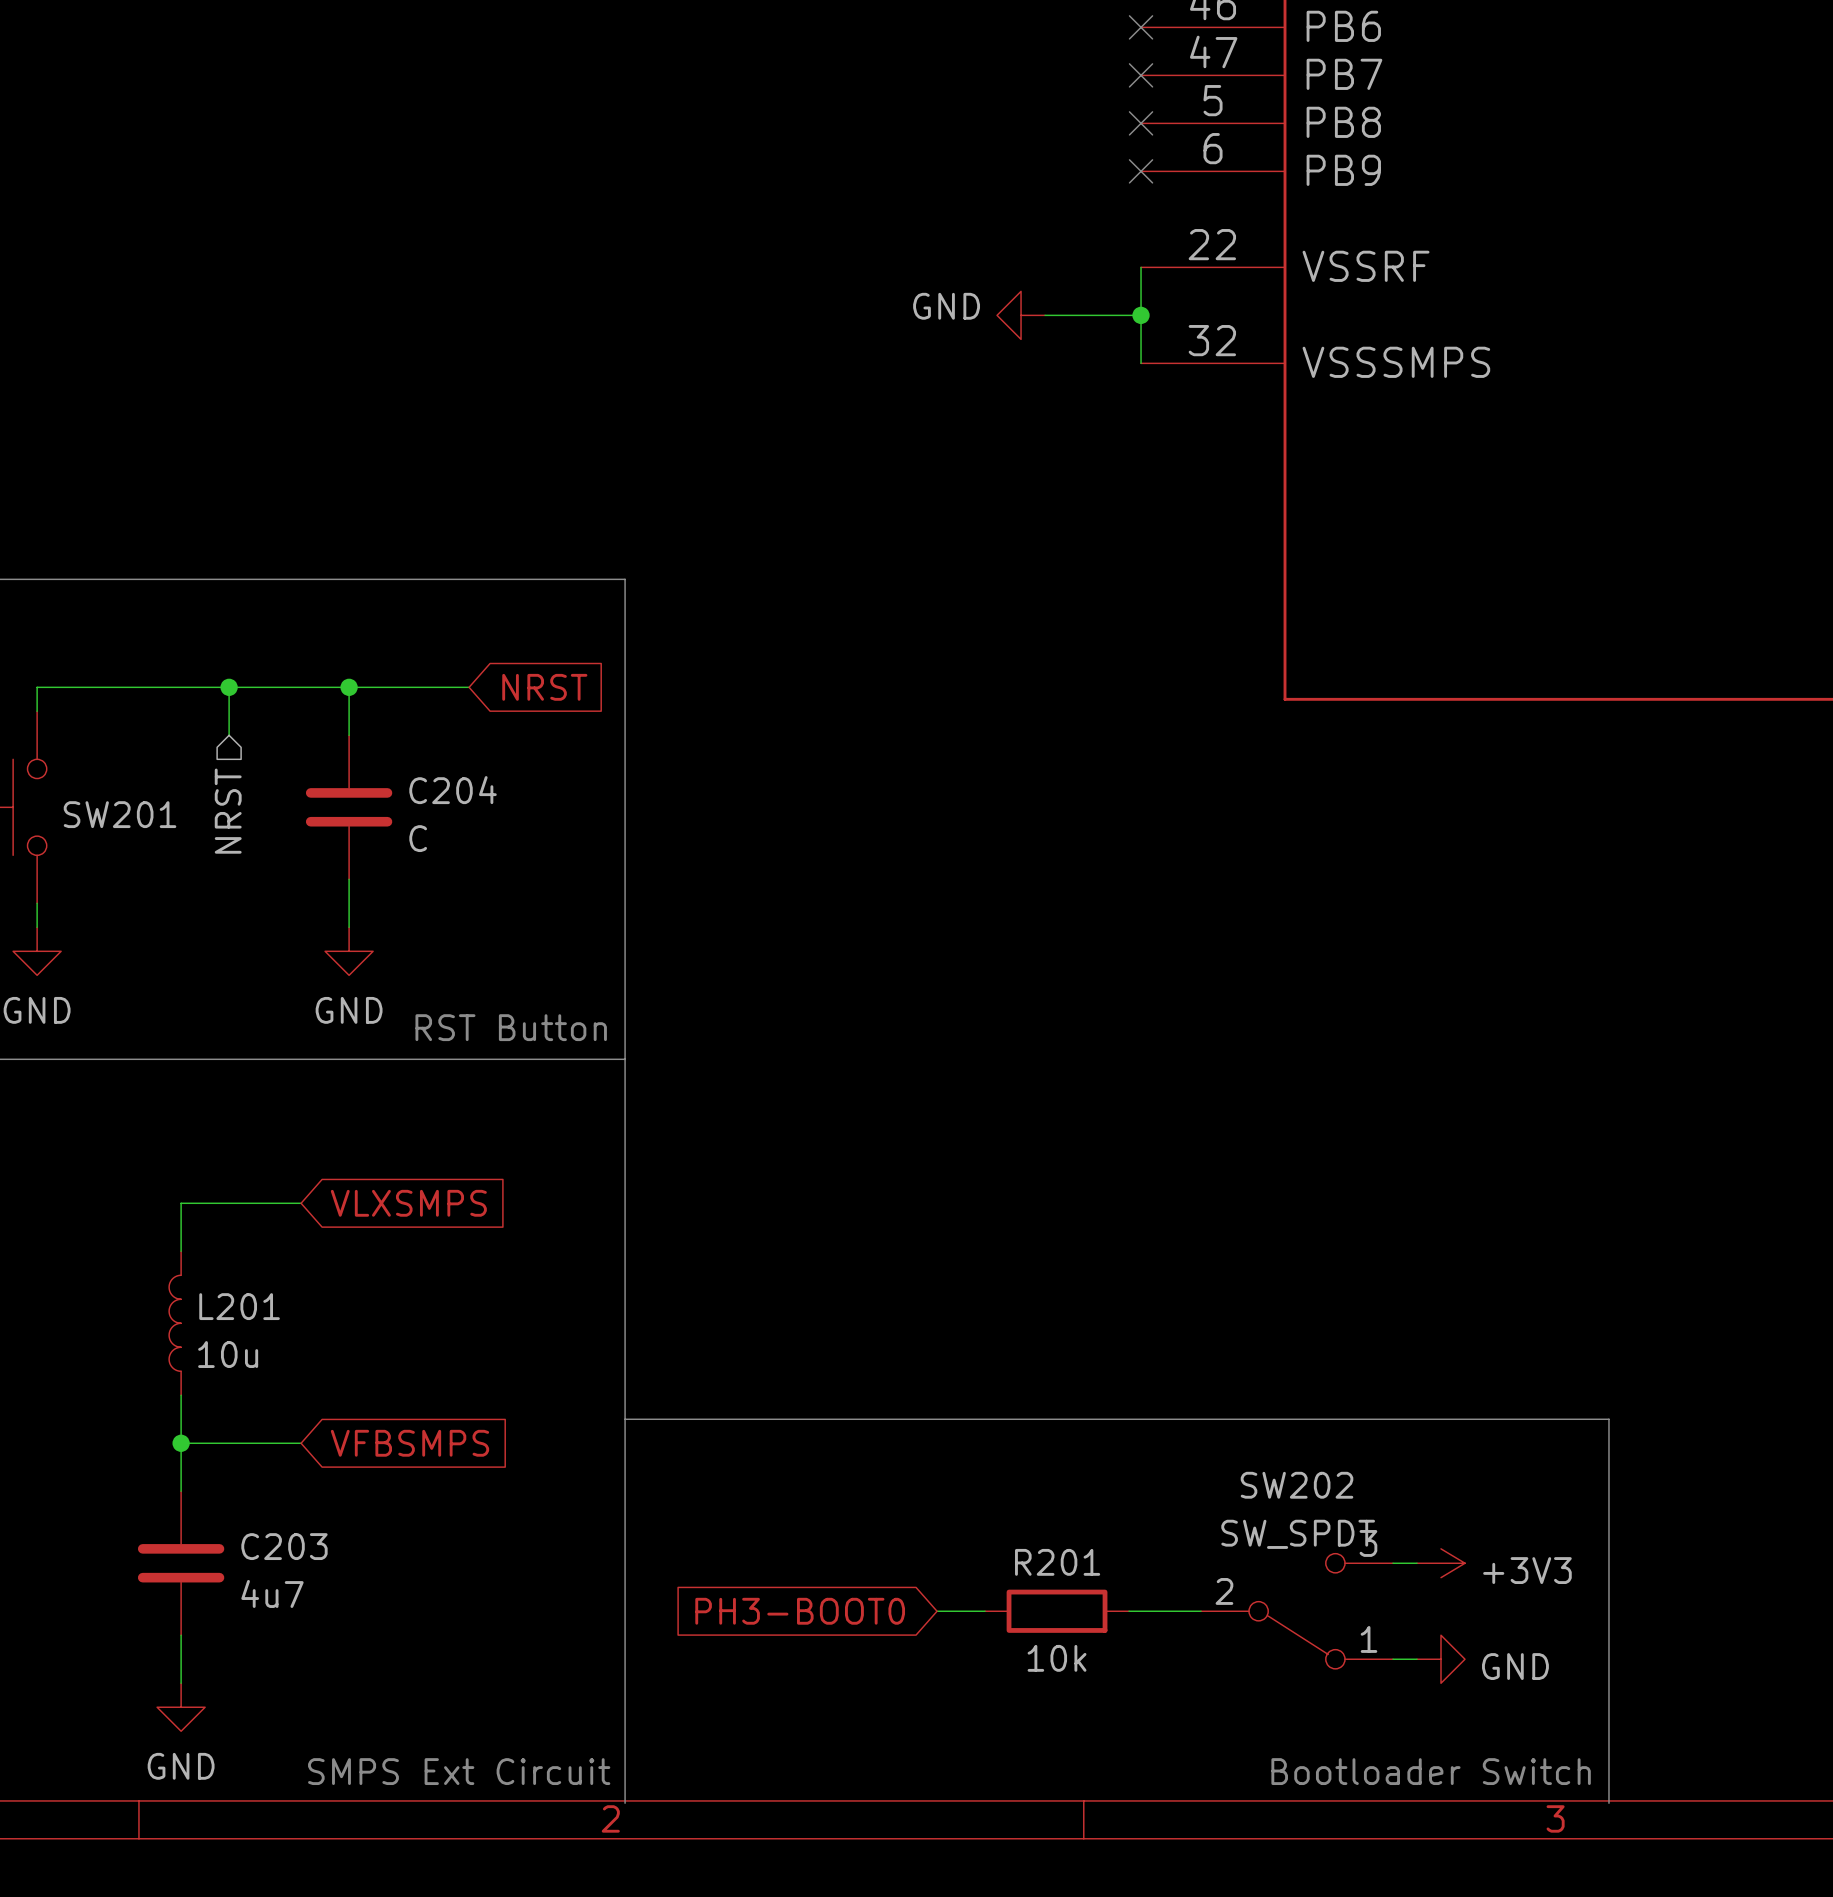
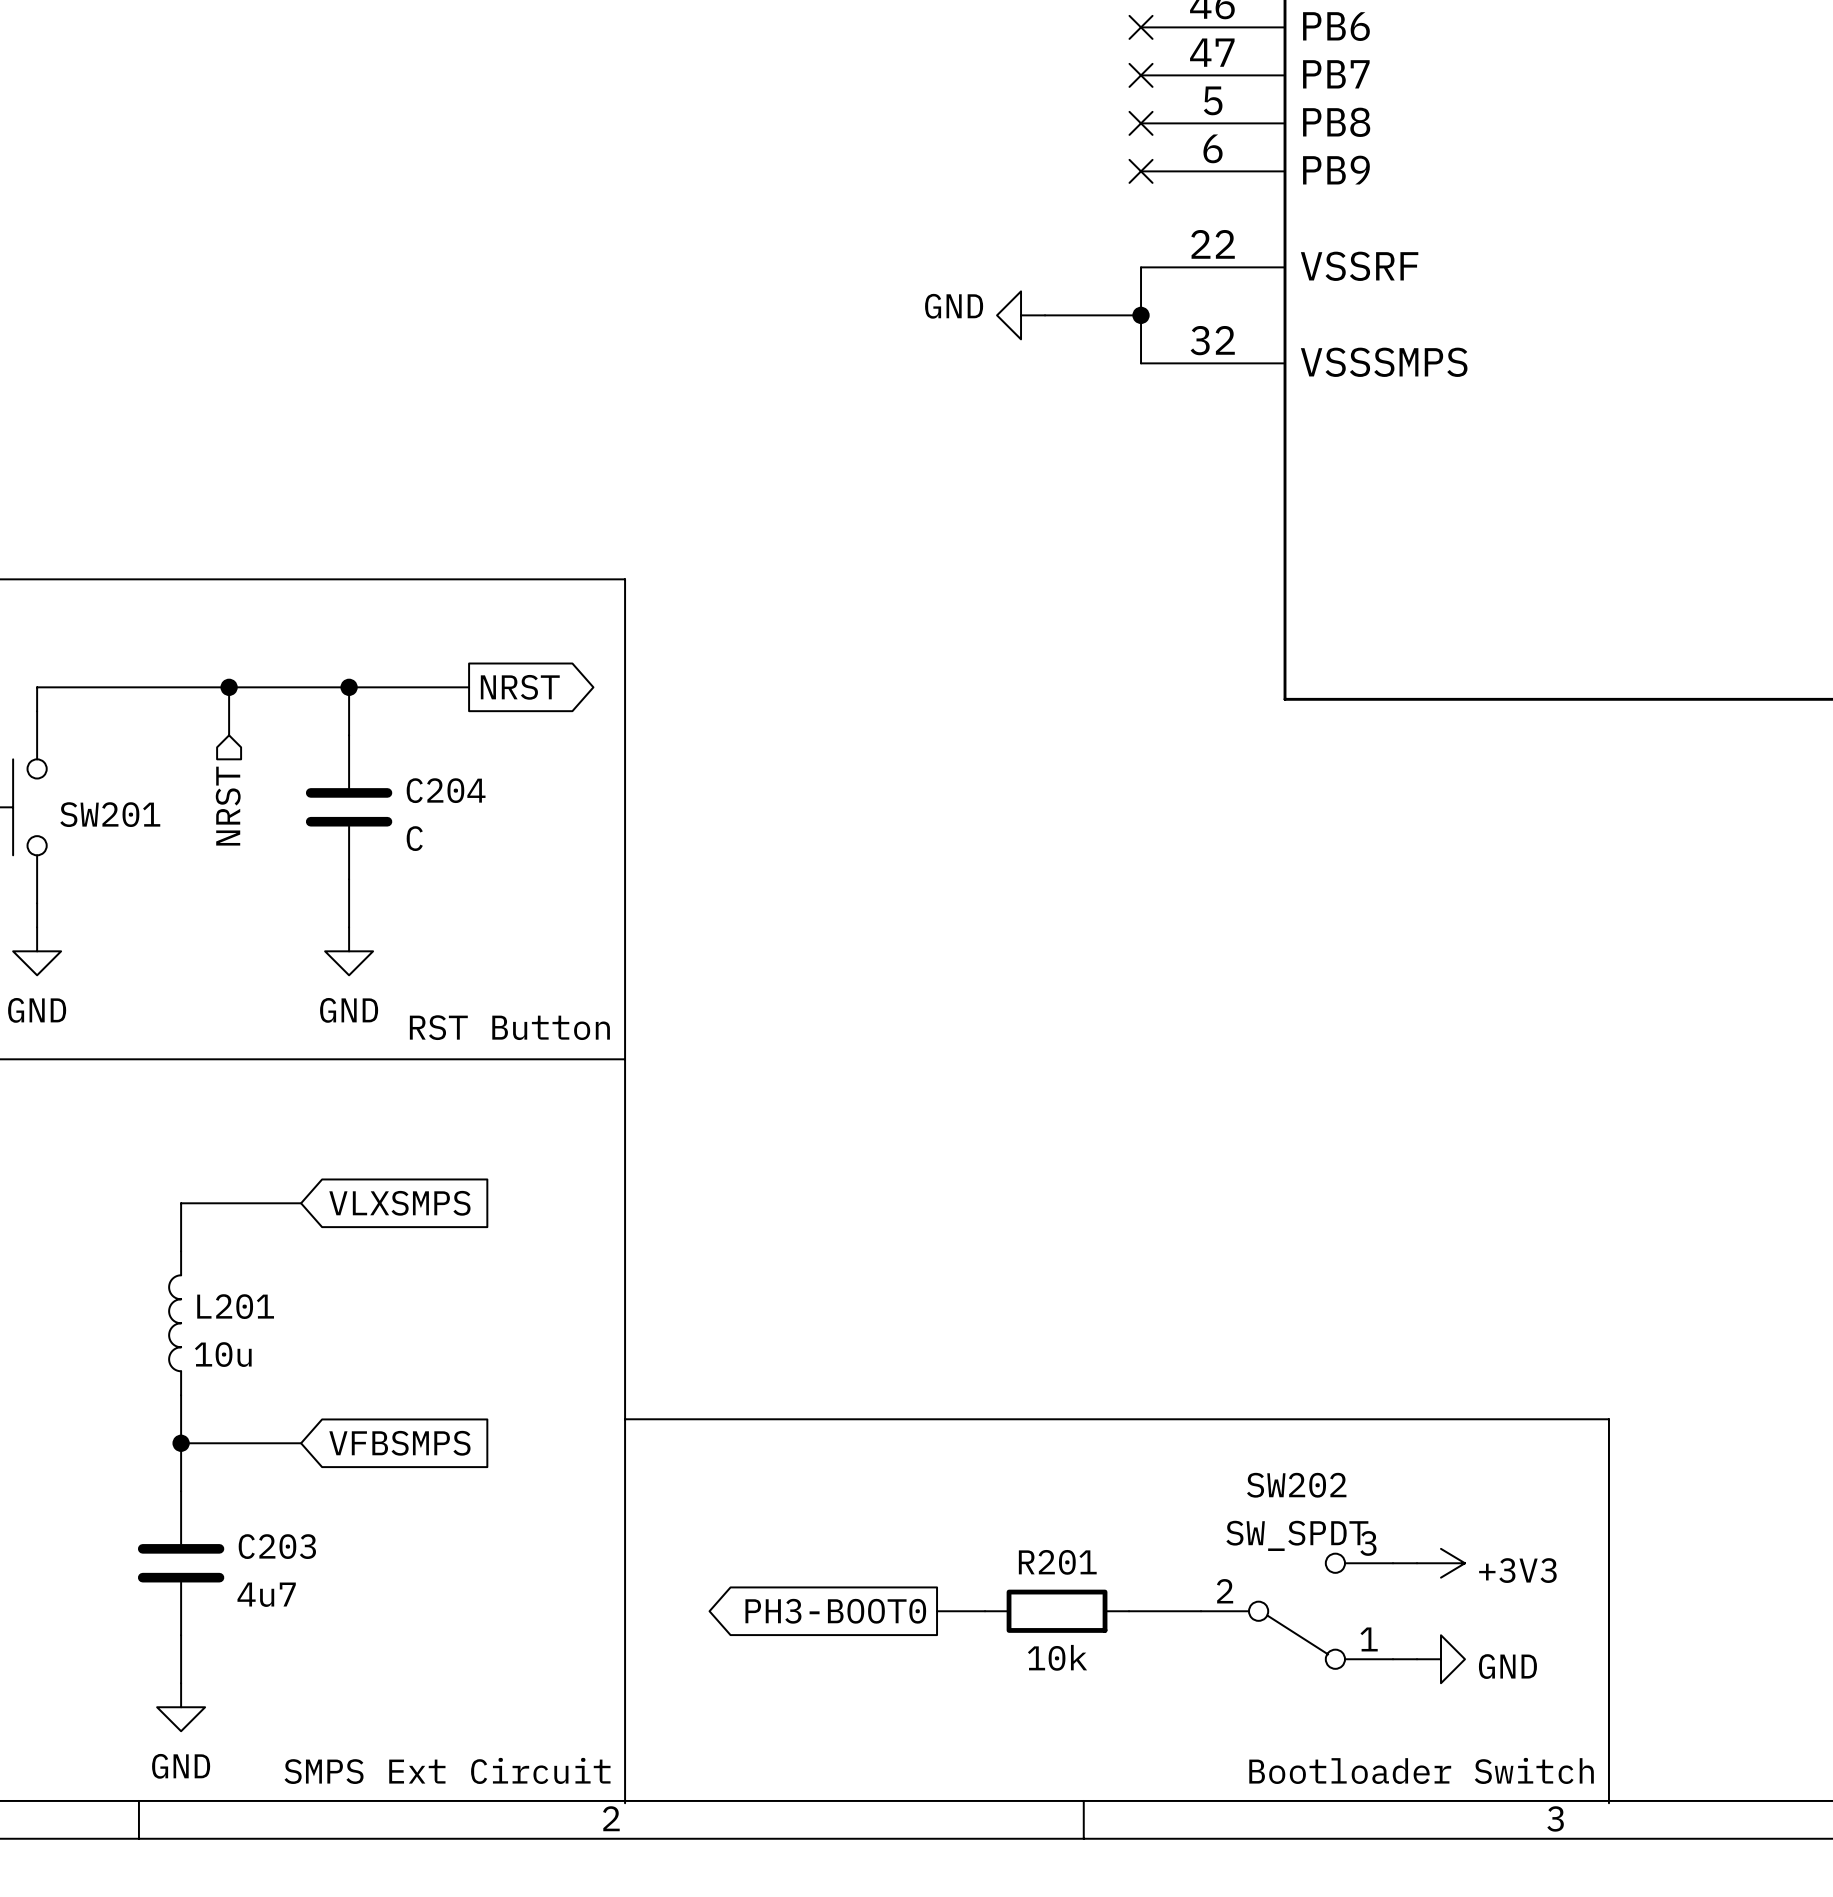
global label shape: input (544, 687) -> output (520, 687)
global label shape: input (800, 1611) -> output (835, 1611)

